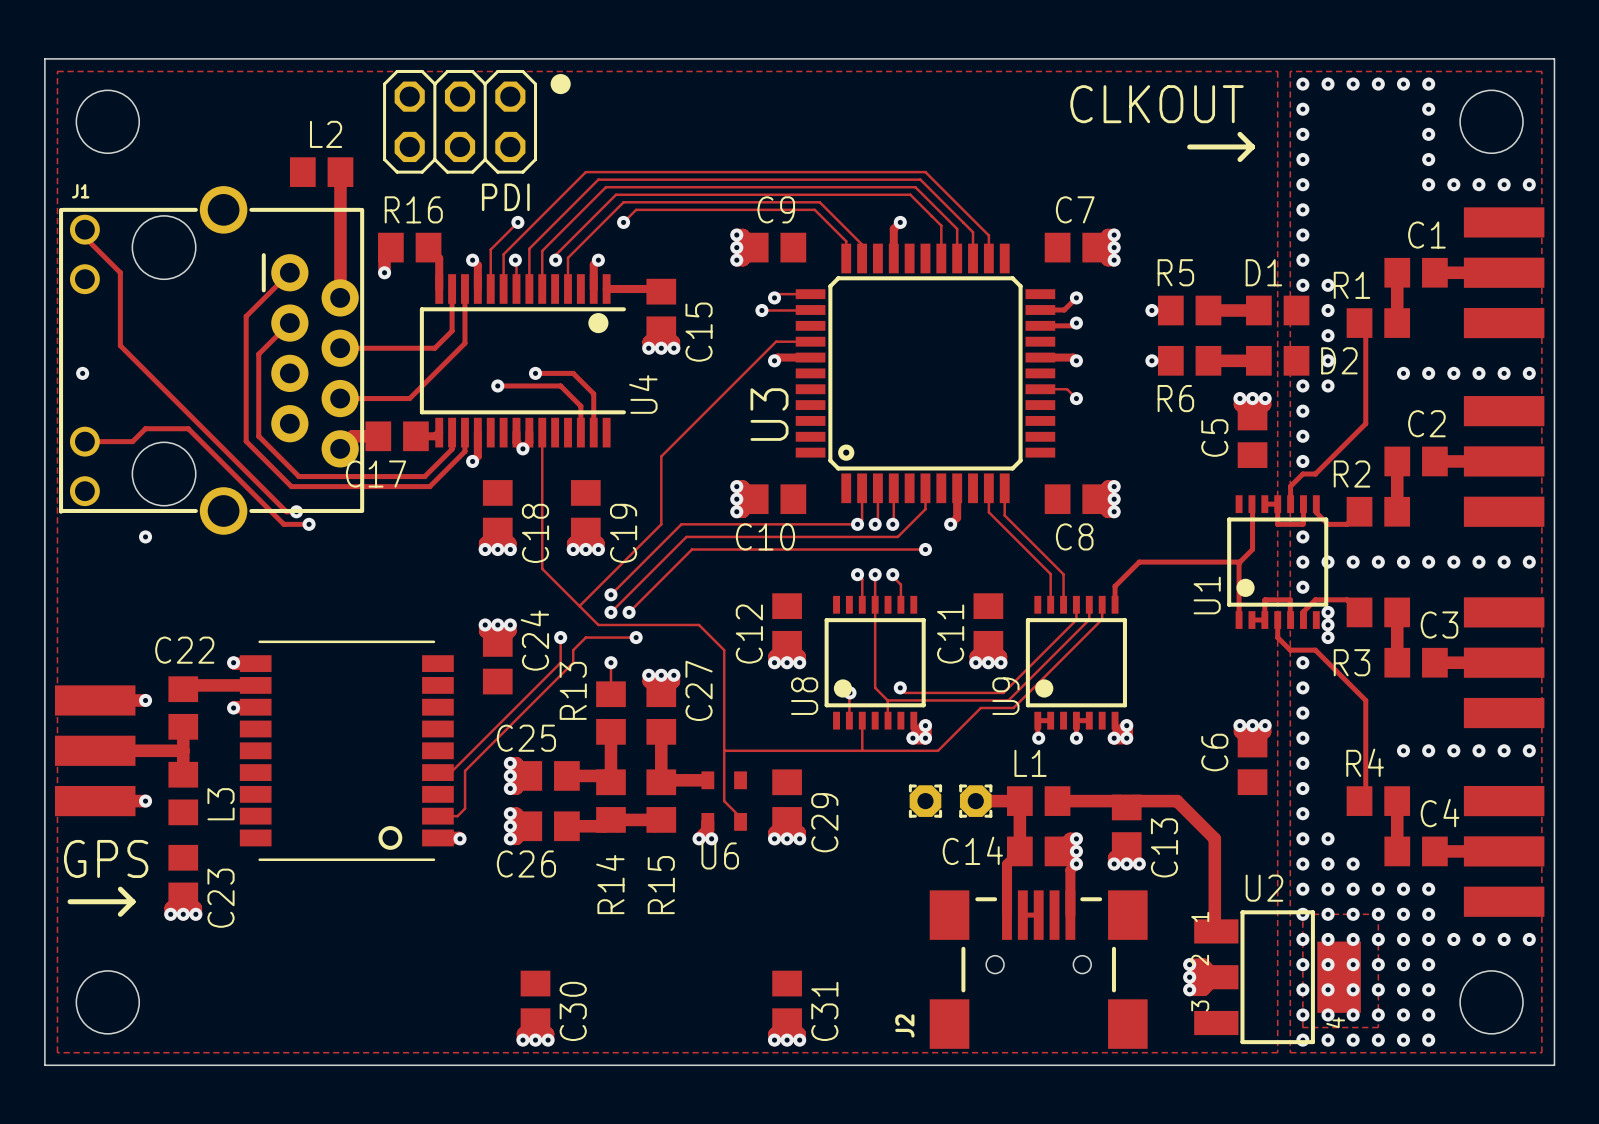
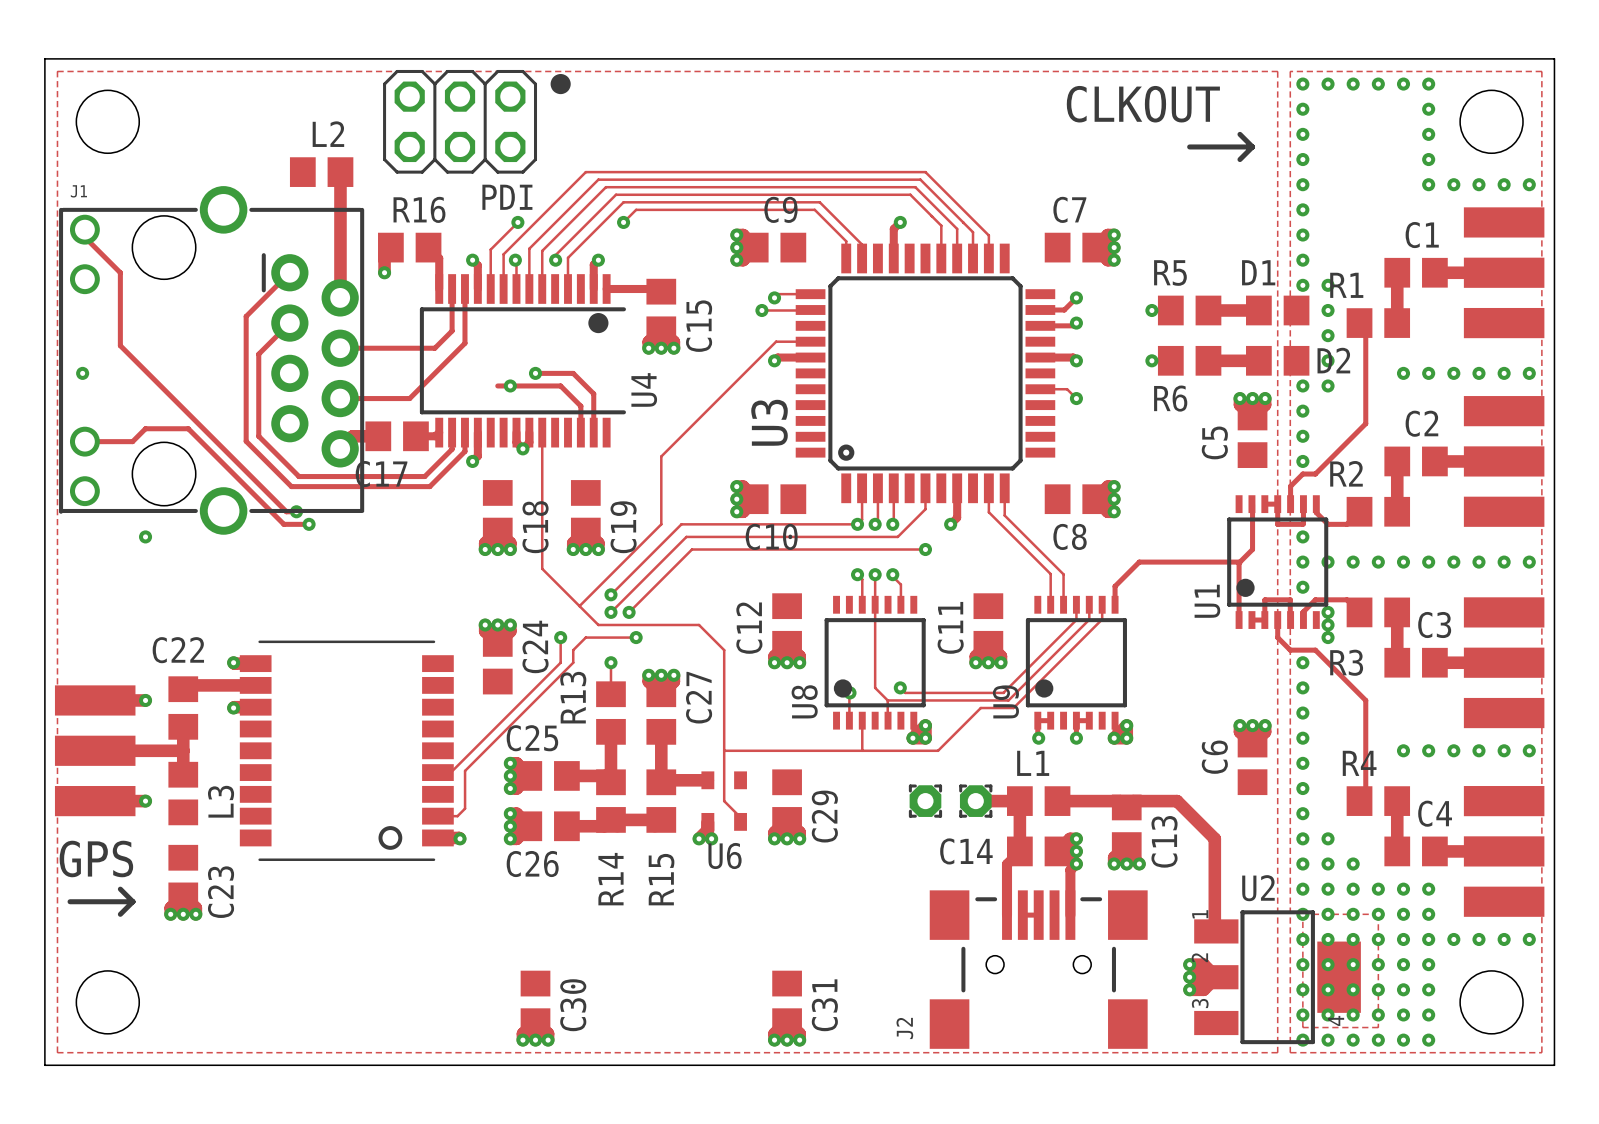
via position: (497, 385) -> (510, 385)

